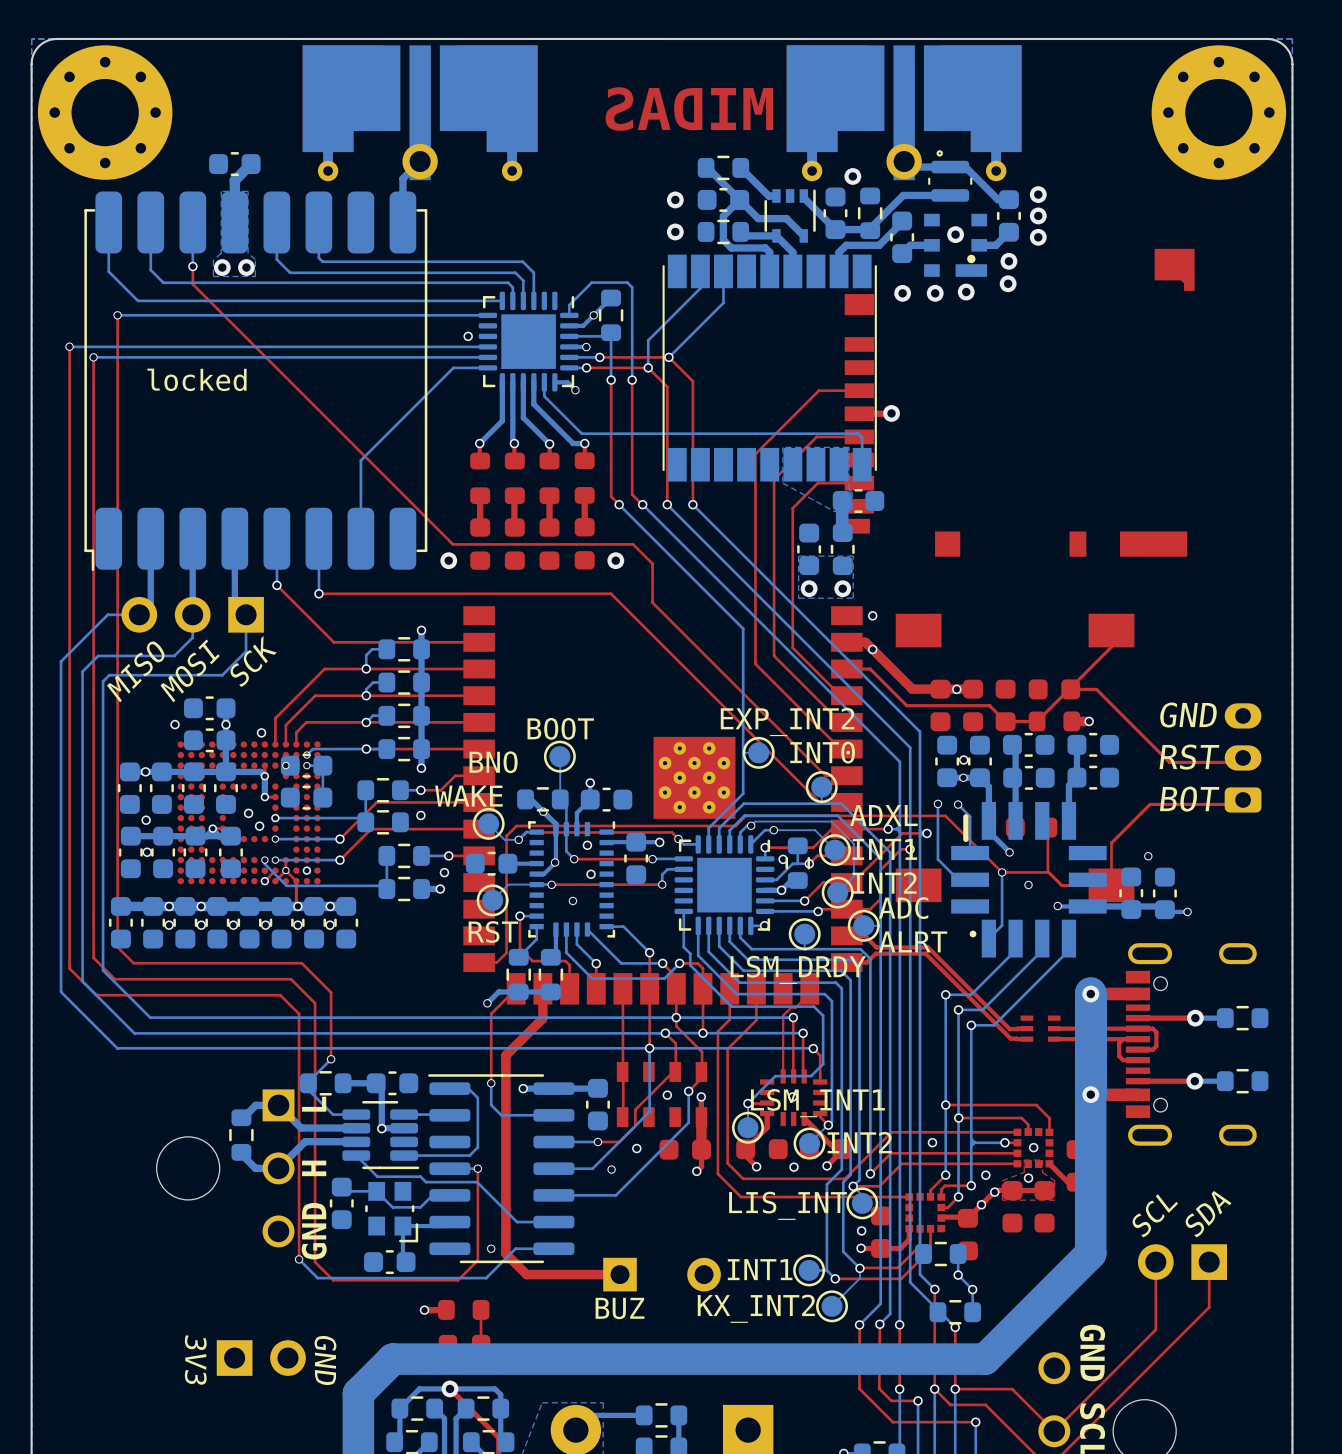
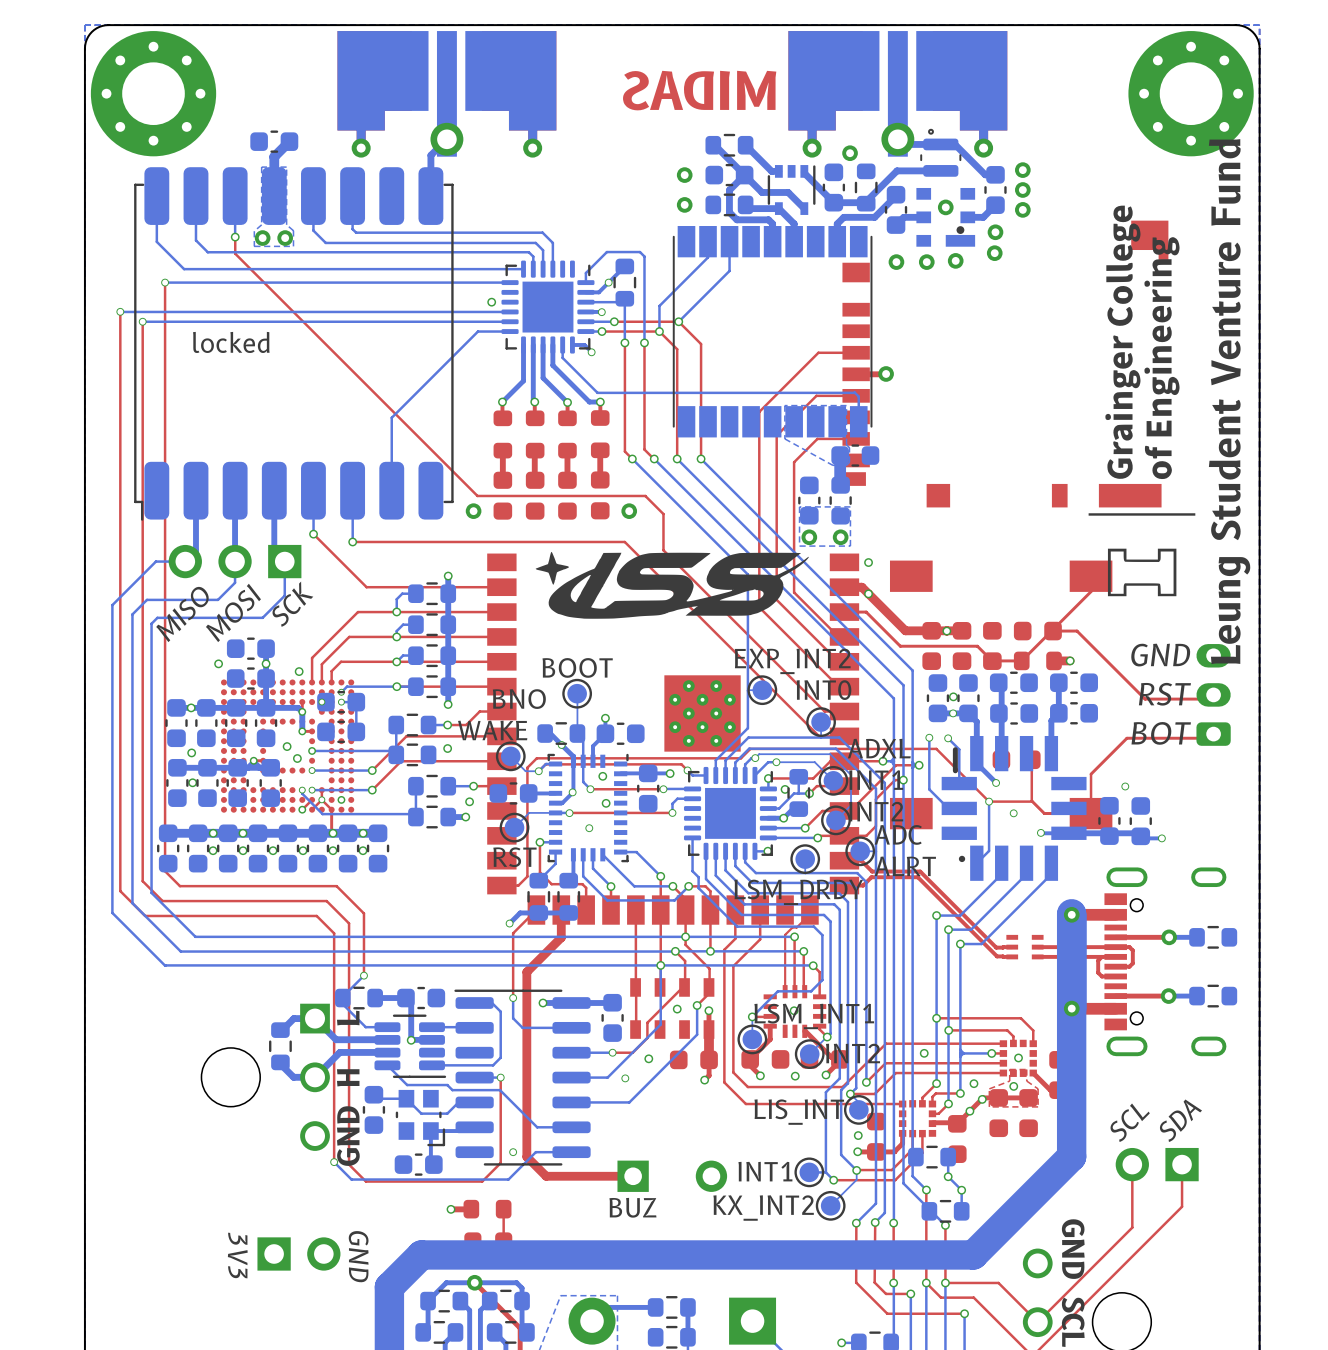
drawing: none -> [1088, 205, 1196, 597]
text: none -> Leung Student Venture Fund (1229, 401)
drawing: none -> [535, 551, 809, 619]

